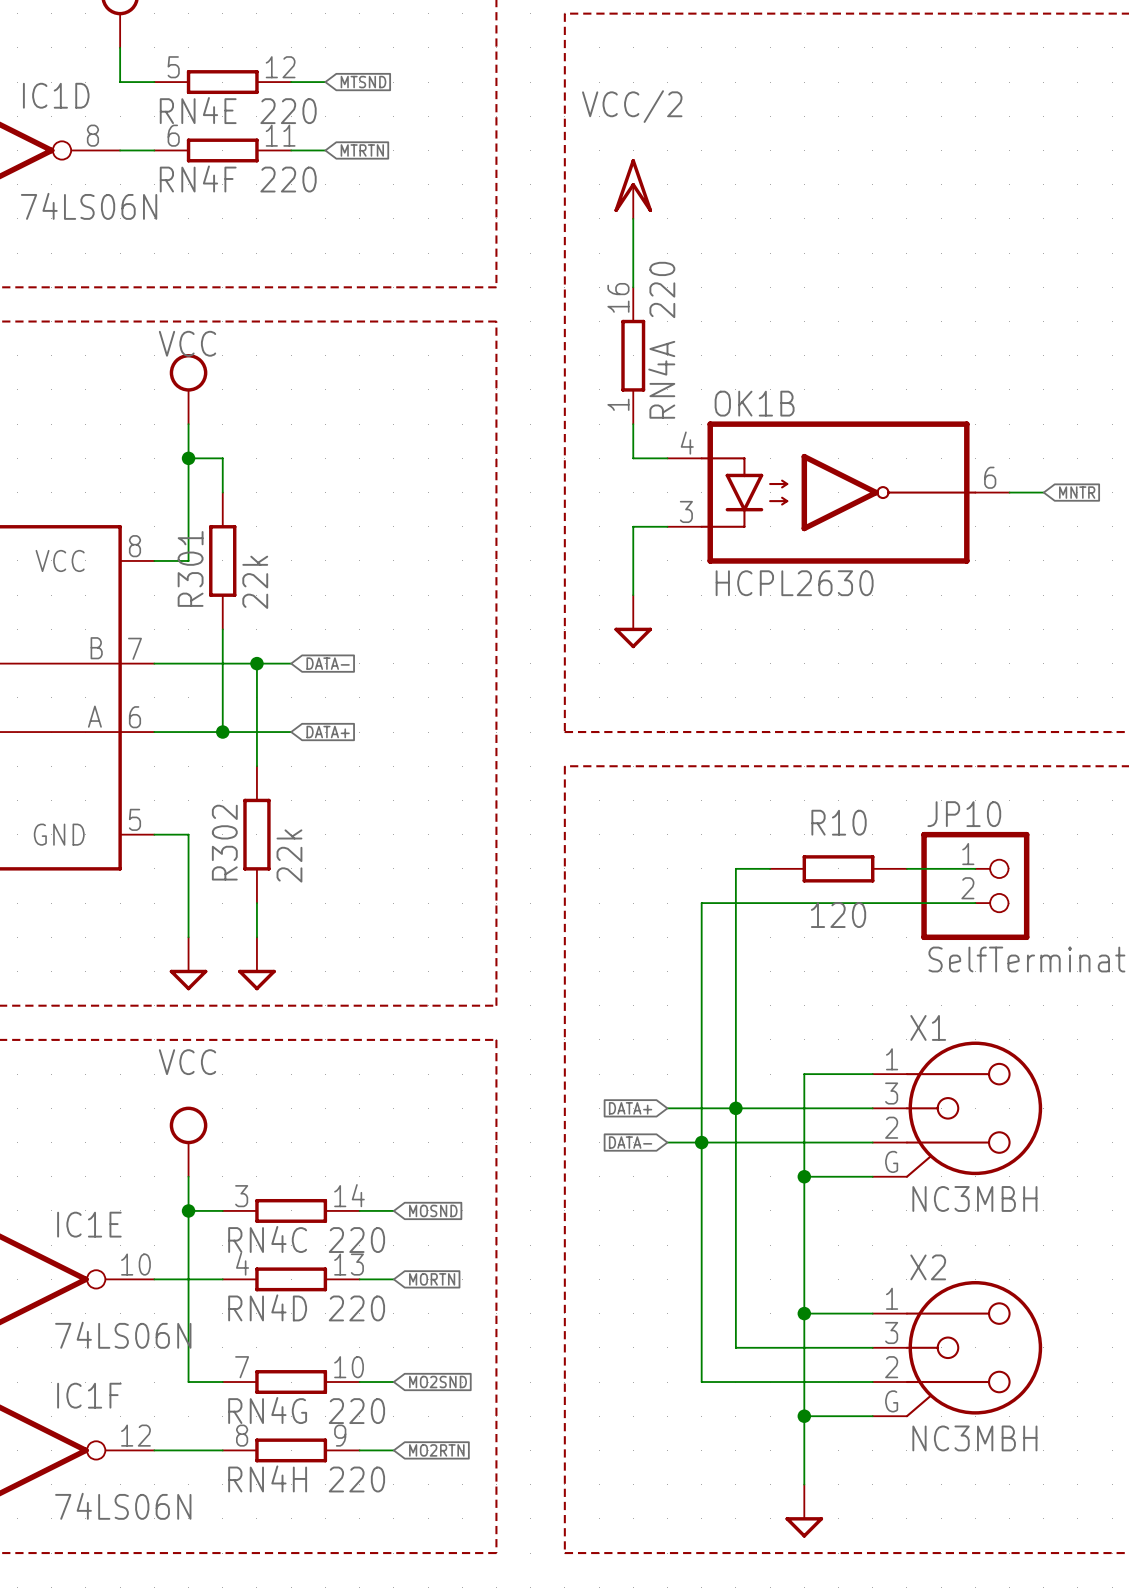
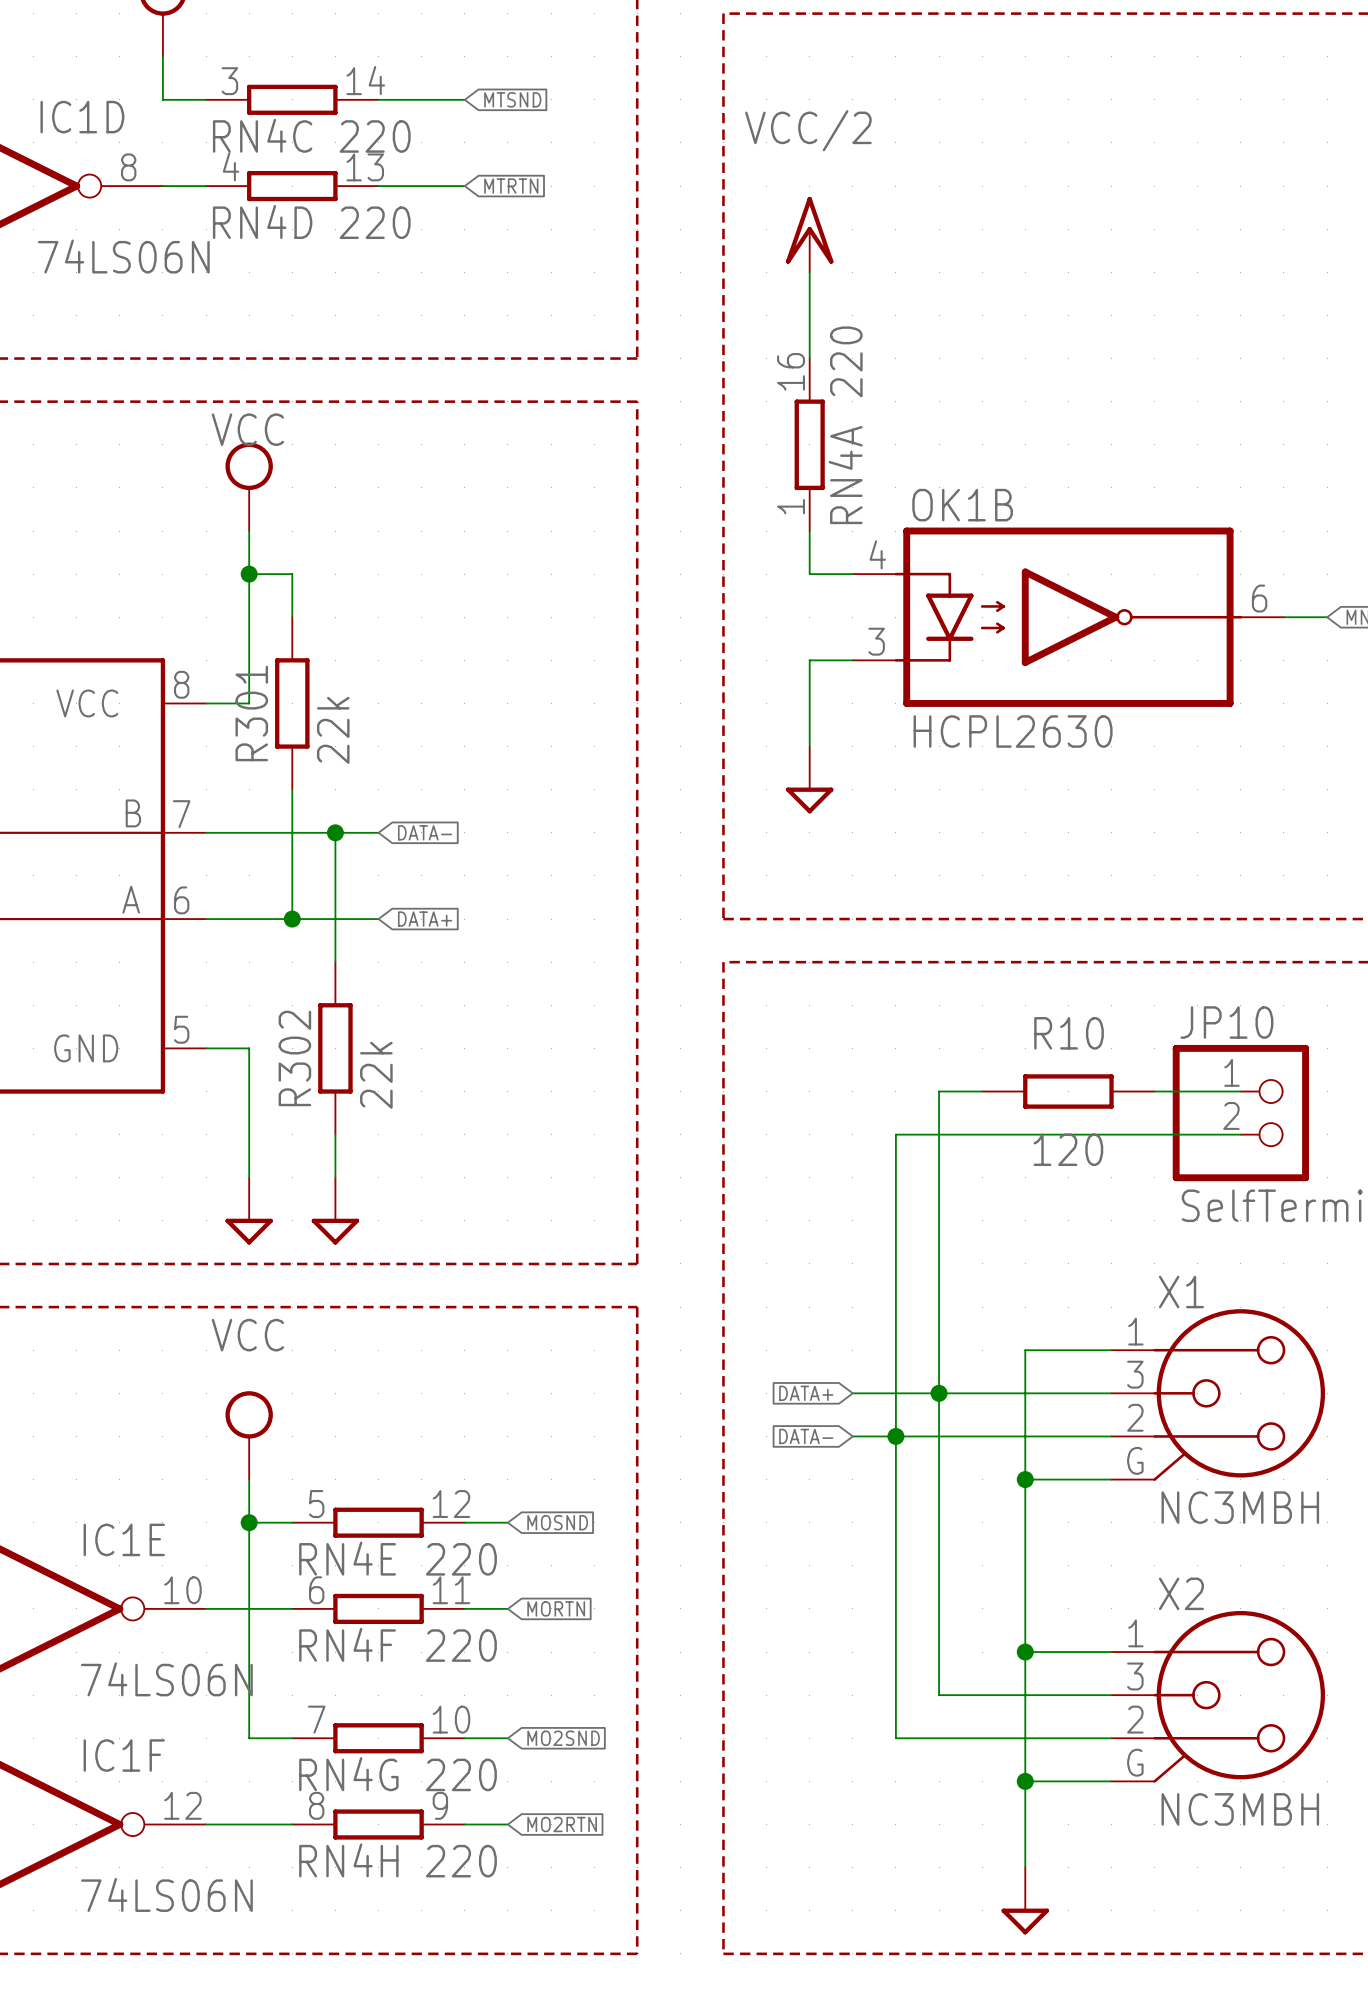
RN4E position: (222, 82) -> (378, 1522)
wire: none -> (421, 99) (464, 99)
global label position: MTSND (363, 82) -> MTSND (512, 99)
RN4F position: (222, 150) -> (378, 1608)
wire: none -> (421, 186) (464, 186)
global label position: MTRTN (362, 150) -> MTRTN (511, 186)
RN4C position: (291, 1210) -> (292, 99)
RN4D position: (291, 1279) -> (292, 186)

